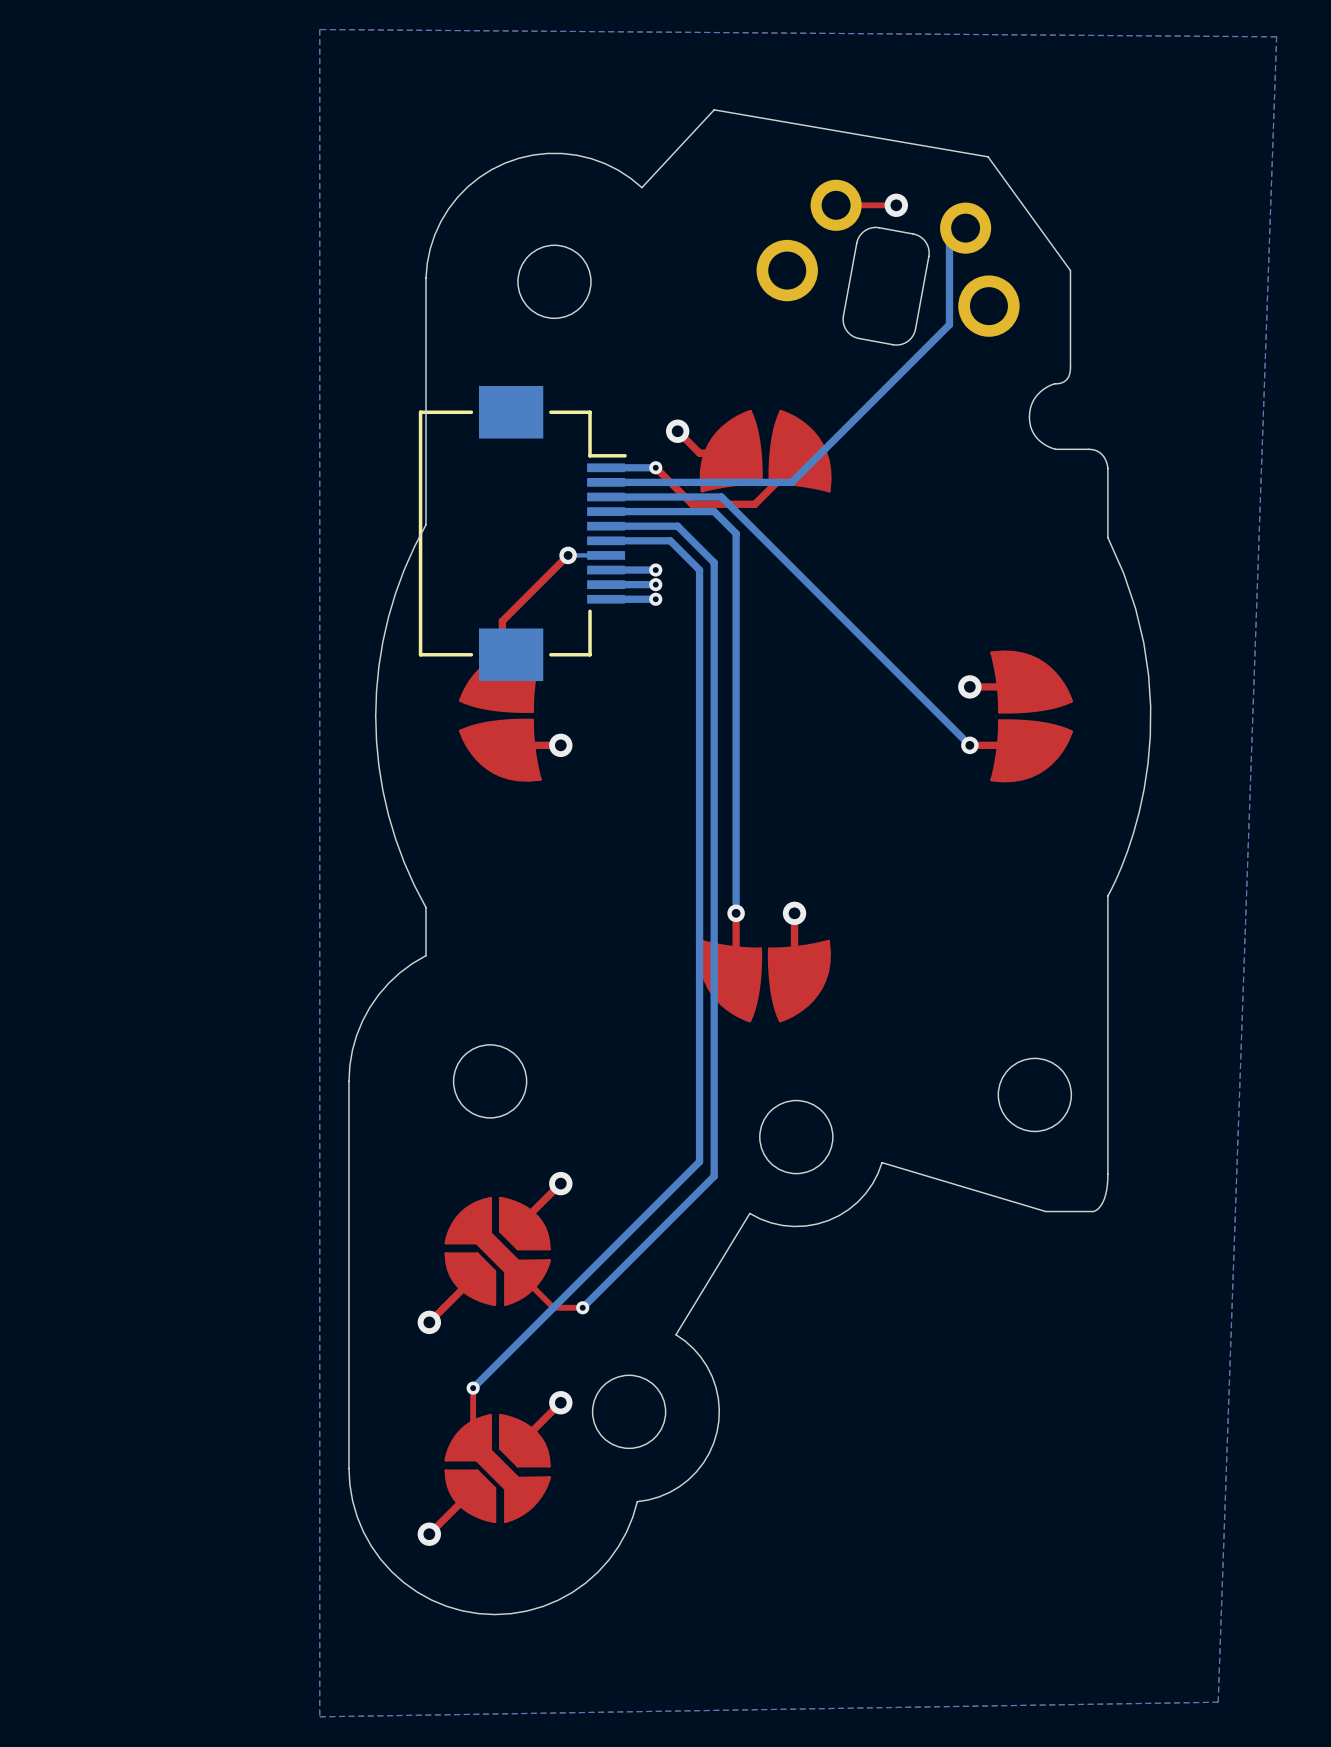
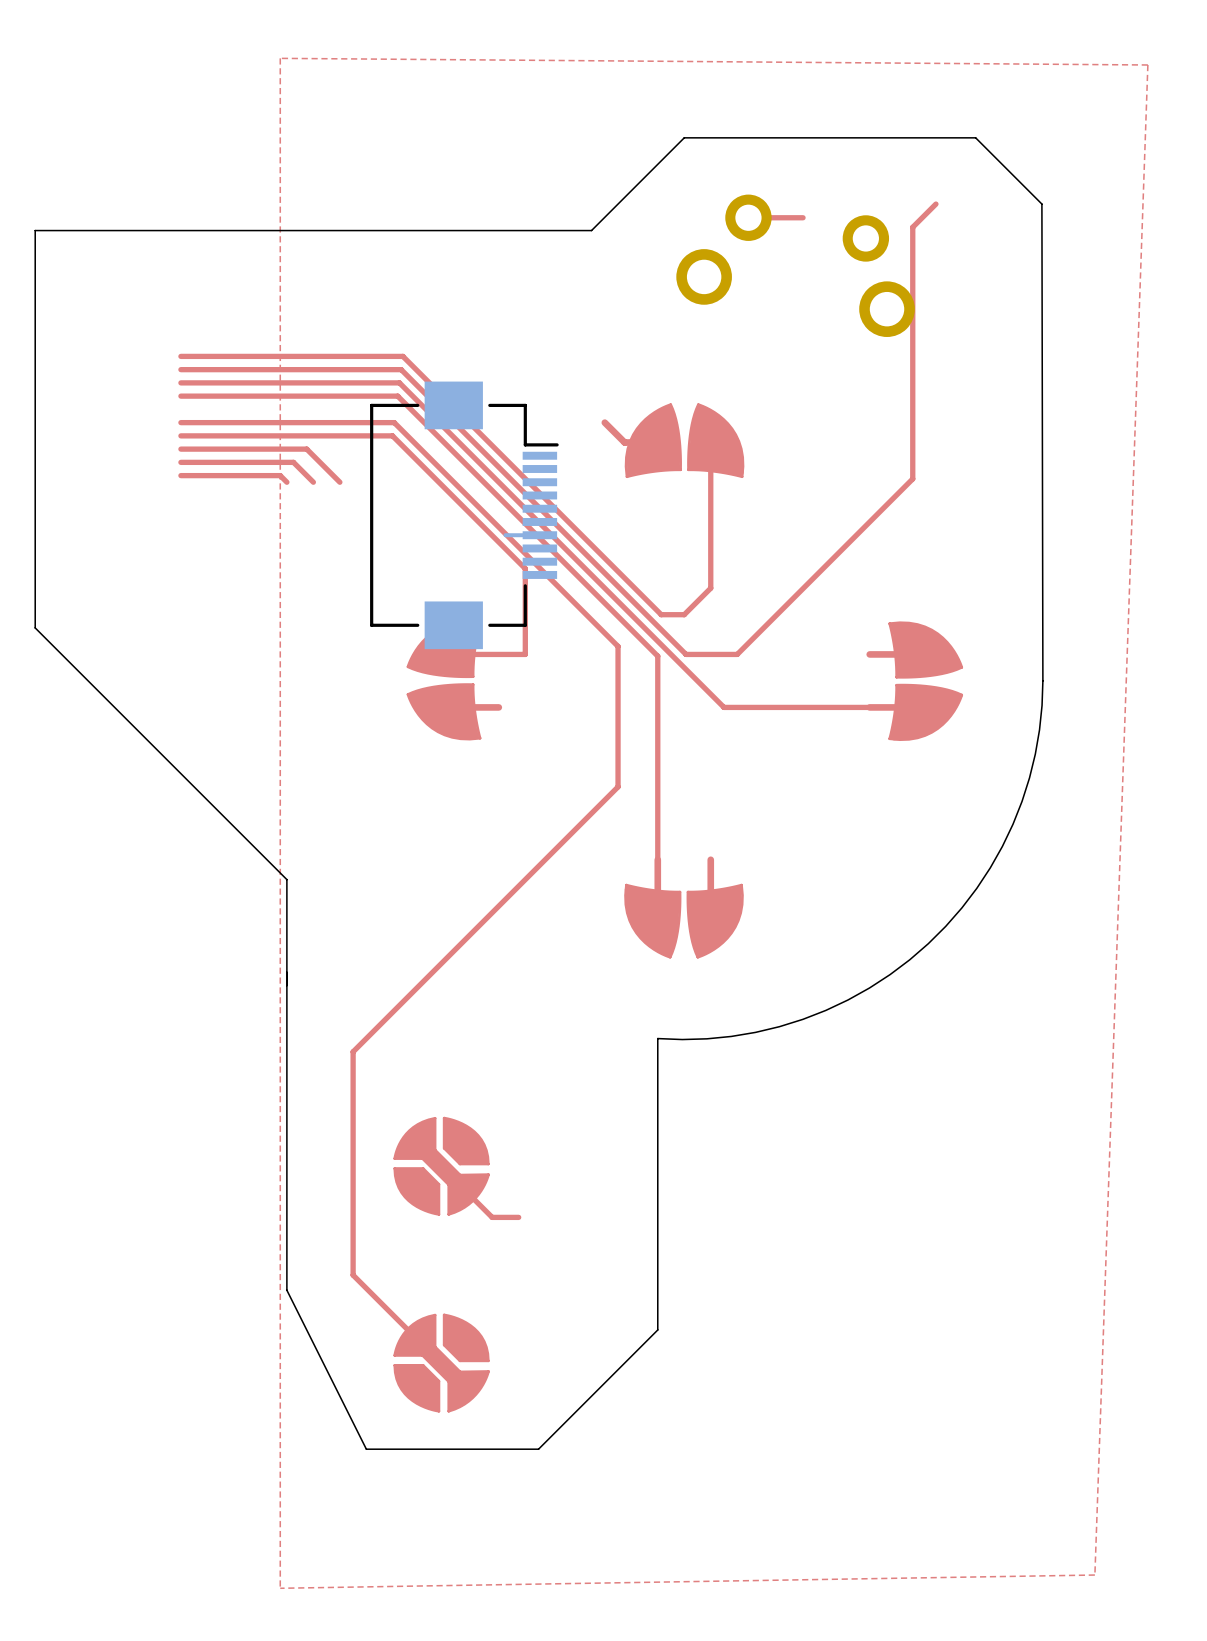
bottom zone outline: (319, 29) (1276, 36) (1218, 1702) (319, 1716) (319, 29) -> none
board edge: (714, 109) (988, 156) (1070, 270) (1069, 373) (1064, 381) (1048, 386) (1037, 394) (1030, 408) (1029, 421) (1035, 436) (1047, 446) (1055, 449) (1094, 450) (1101, 453) (1105, 460) (1107, 468) (1107, 537) (1123, 573) (1135, 608) (1143, 642) (1150, 706) (1147, 763) (1139, 812) (1127, 851) (1107, 895) (1106, 1190) (1101, 1203) (1093, 1211) (1045, 1211) (882, 1162) (872, 1183) (865, 1193) (848, 1209) (828, 1220) (805, 1226) (782, 1225) (760, 1218) (749, 1213) (676, 1334) (701, 1357) (715, 1387) (719, 1409) (717, 1432) (703, 1463) (679, 1486) (659, 1496) (637, 1501) (626, 1532) (608, 1560) (585, 1583) (572, 1592) (542, 1606) (527, 1610) (494, 1614) (478, 1613) (446, 1606) (431, 1599) (403, 1582) (380, 1559) (363, 1531) (357, 1516) (352, 1500) (348, 1468) (349, 1065) (352, 1050) (362, 1021) (378, 994) (400, 972) (425, 955) (425, 907) (404, 862) (388, 815) (378, 766) (375, 716) (378, 666) (388, 617) (404, 569) (425, 524) (427, 263) (434, 234) (448, 208) (467, 186) (491, 169) (518, 158) (533, 155) (547, 153) (577, 155) (605, 163) (618, 170) (641, 187) (714, 109) -> (975, 137) (1041, 204) (1042, 705) (1039, 729) (1029, 778) (1012, 824) (990, 867) (961, 907) (928, 943) (909, 959) (869, 987) (825, 1010) (779, 1026) (755, 1032) (706, 1038) (657, 1038) (657, 1329) (538, 1449) (366, 1449) (286, 1290) (286, 879) (35, 627) (35, 230) (591, 230) (684, 137) (975, 137)
top track: none -> (935, 204) (912, 227) (912, 478) (737, 654) (686, 654) (401, 369) (180, 369)
via: (896, 205) -> none
board edge: (879, 227) (917, 235) (924, 240) (928, 248) (915, 331) (910, 339) (900, 344) (855, 337) (847, 331) (843, 323) (857, 239) (866, 229) (879, 227) -> none
bottom track: (965, 228) (949, 244) (949, 324) (791, 482) (606, 482) -> none
round board edge: [517, 244, 592, 320] -> none
top track: none -> (180, 382) (399, 382) (724, 707) (869, 707)
top track: none -> (180, 396) (397, 396) (657, 656) (657, 859)
via: (677, 431) -> none
top track: (794, 453) (806, 453) (754, 504) (692, 504) (655, 467) -> (710, 442) (710, 588) (684, 614) (661, 614) (402, 356) (180, 356)
top track: none -> (180, 449) (306, 449) (339, 482)
bottom track: (655, 467) (606, 467) -> none
via: (655, 467) -> none
top track: none -> (180, 462) (293, 462) (313, 482)
top track: none -> (180, 475) (280, 475) (286, 482)
bottom track: (606, 496) (721, 496) (969, 745) -> none
bottom track: (606, 511) (714, 511) (736, 533) (736, 913) -> none
bottom track: (606, 526) (677, 526) (714, 562) (714, 1176) (582, 1307) -> none
bottom track: (606, 540) (670, 540) (699, 570) (699, 1161) (473, 1388) -> none
top track: (568, 555) (502, 621) (502, 686) -> (180, 435) (392, 435) (525, 568) (525, 654) (445, 654)
via: (568, 555) -> none
bottom track: (655, 570) (606, 570) -> none
via: (655, 570) -> none
bottom track: (655, 584) (606, 584) -> none
via: (655, 584) -> none
bottom track: (655, 599) (606, 599) -> none
via: (655, 599) -> none
via: (969, 686) -> none
via: (560, 745) -> none
via: (969, 745) -> none
via: (736, 913) -> none
via: (794, 913) -> none
round board edge: [452, 1044, 528, 1119] -> none
round board edge: [997, 1057, 1073, 1133] -> none
round board edge: [759, 1099, 834, 1175] -> none
top track: (560, 1183) (526, 1217) -> none
via: (560, 1183) -> none
top track: (468, 1273) (468, 1283) (429, 1322) -> none
via: (582, 1307) -> none
via: (429, 1322) -> none
round board edge: [591, 1374, 667, 1450] -> none
top track: (473, 1388) (473, 1444) -> (180, 422) (394, 422) (618, 646) (618, 786) (353, 1051) (353, 1275) (419, 1341)
via: (473, 1388) -> none
top track: (560, 1402) (526, 1436) (526, 1446) -> none
via: (560, 1402) -> none
top track: (468, 1490) (468, 1495) (429, 1534) -> none
via: (429, 1534) -> none

